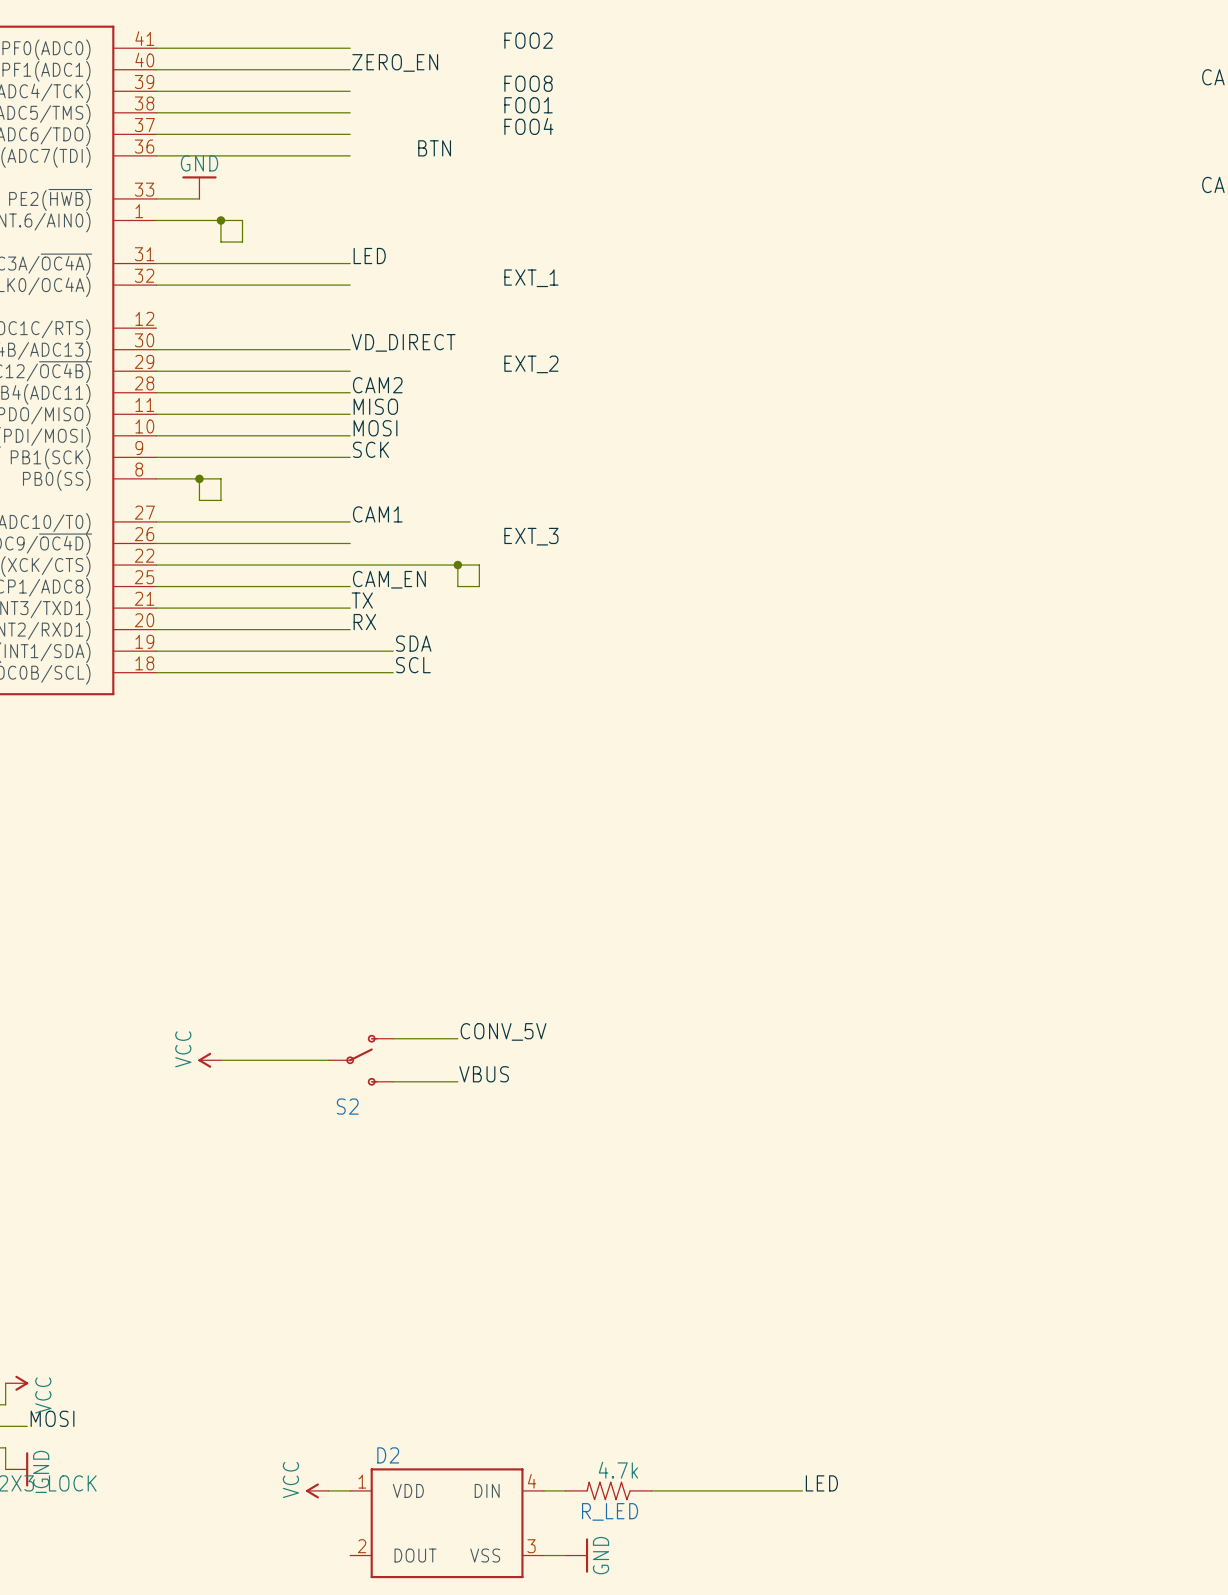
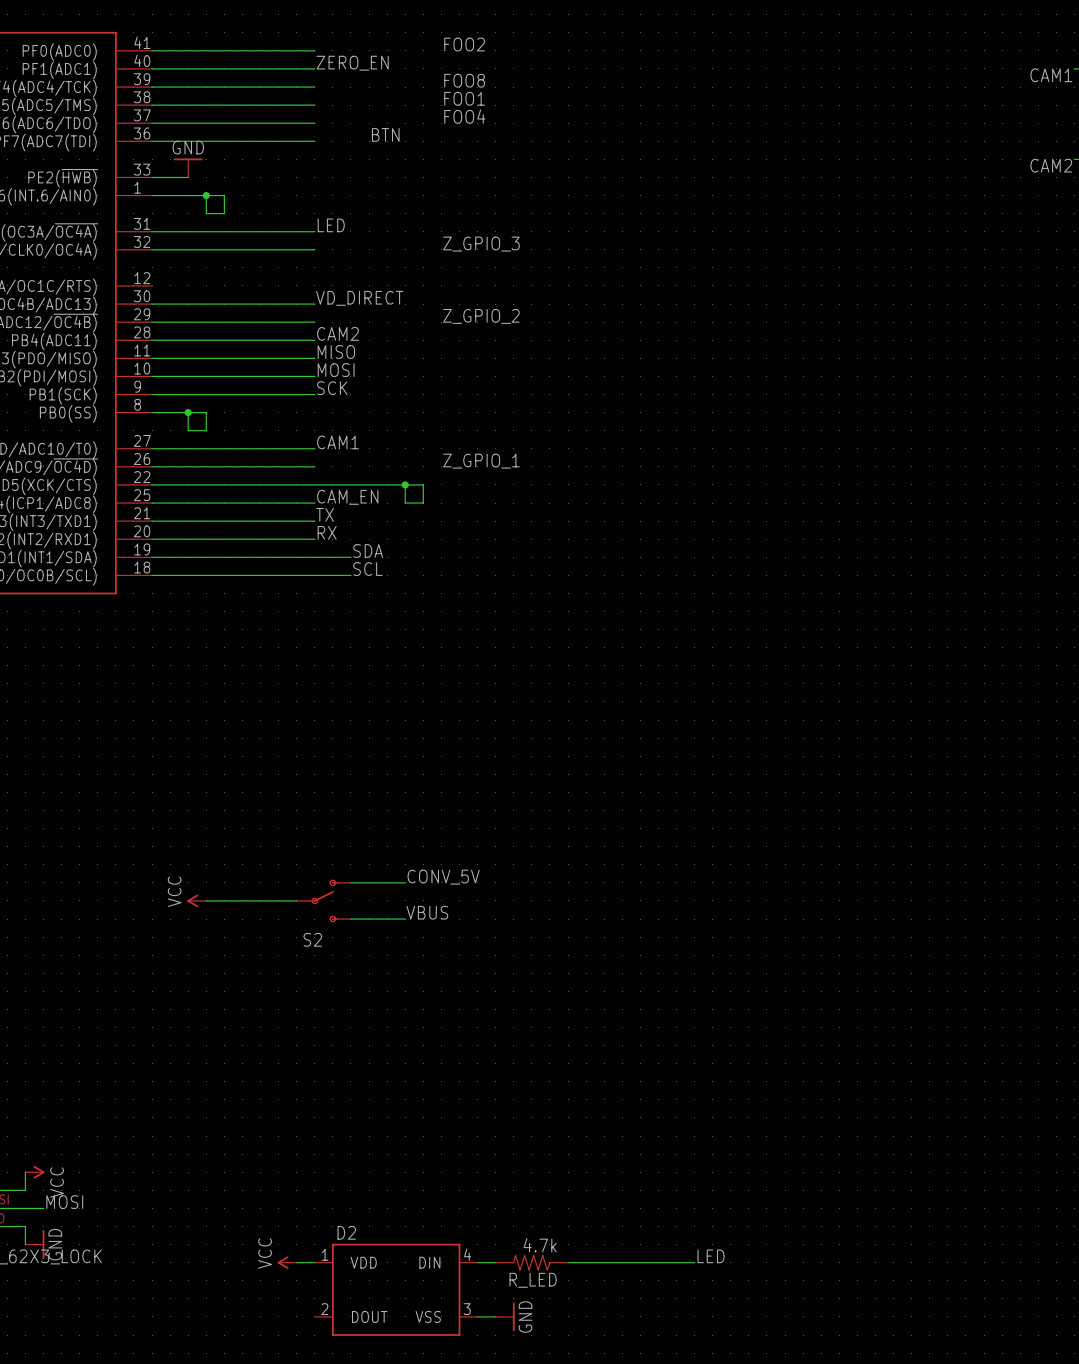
label: EXT_1 (531, 278) -> Z_GPIO_3 (481, 244)
label: EXT_2 (531, 364) -> Z_GPIO_2 (481, 316)
label: EXT_3 (531, 536) -> Z_GPIO_1 (481, 461)

